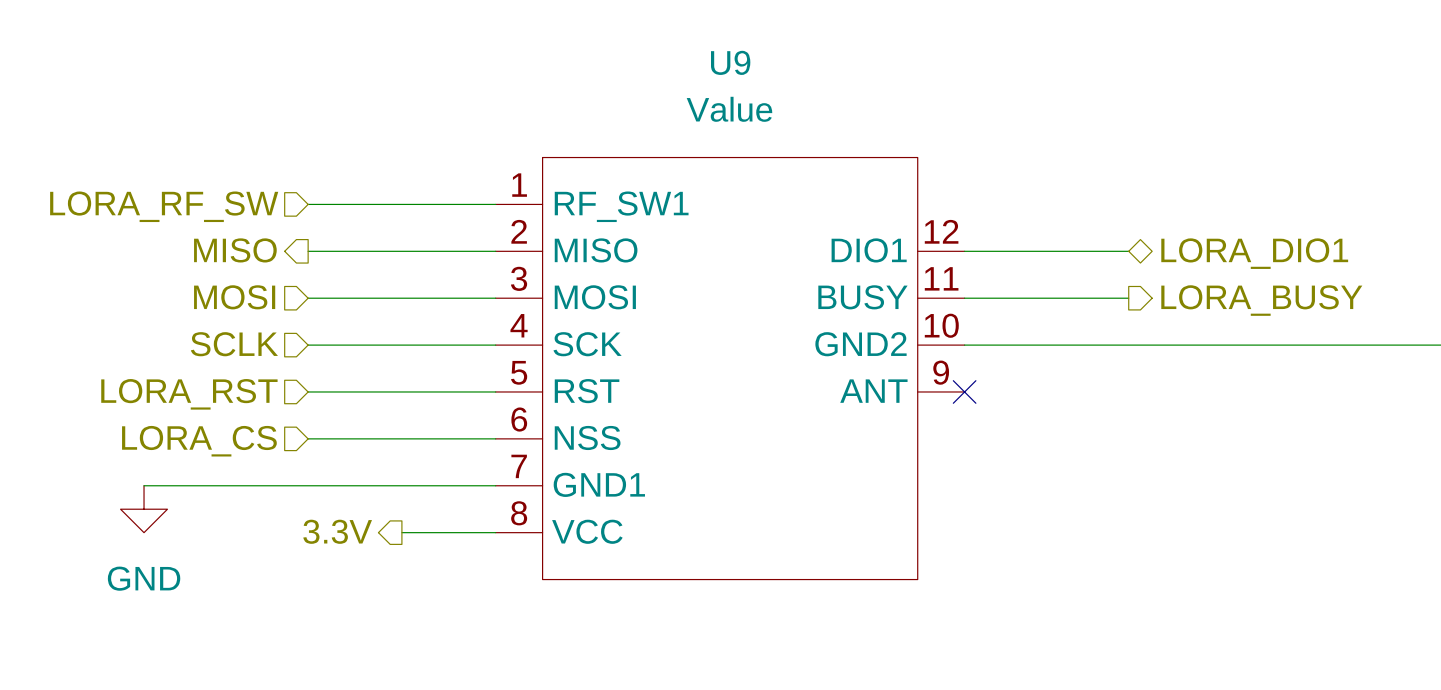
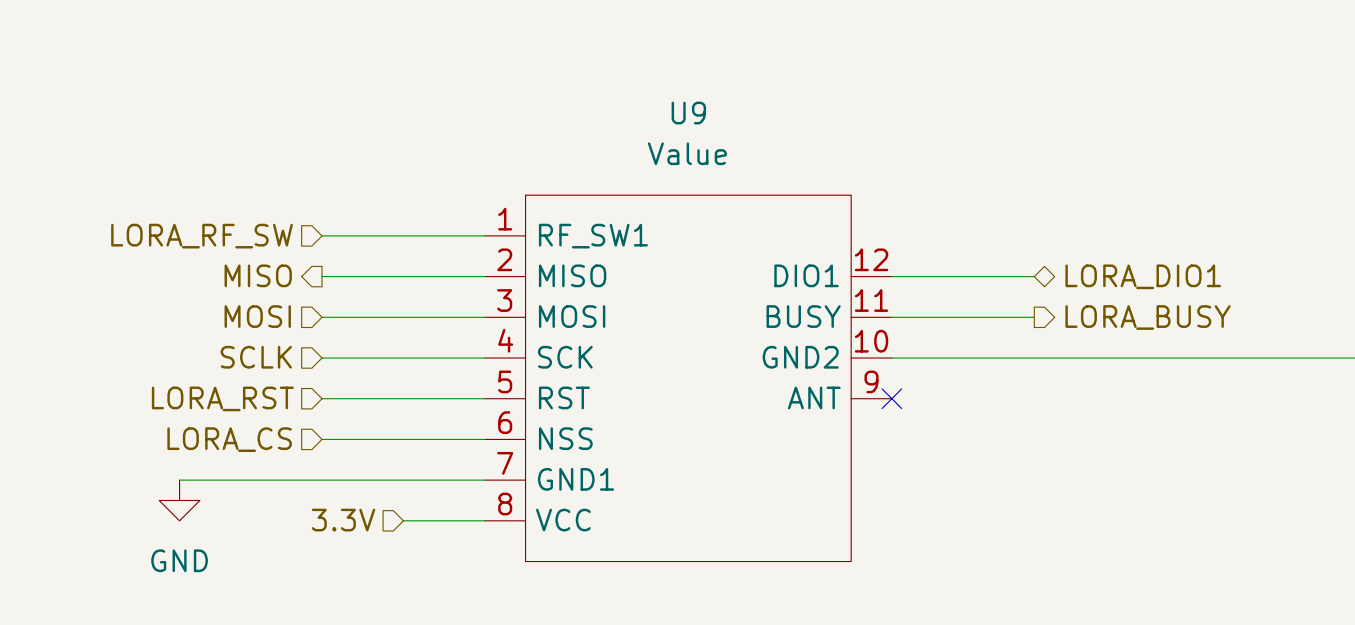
hierarchical label shape: output (337, 531) -> input (343, 520)

